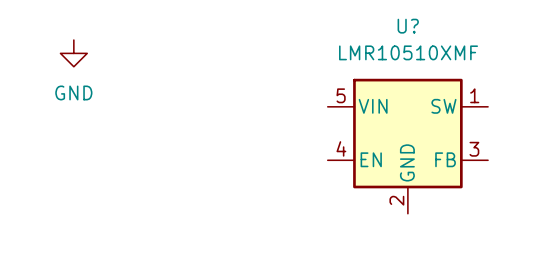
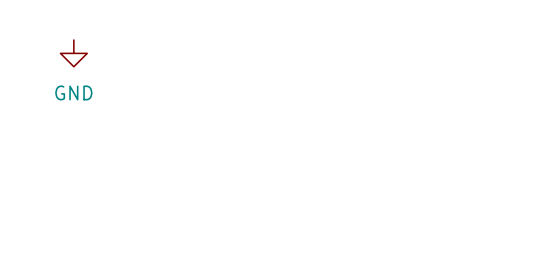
U?: LMR10510XMF (407, 146) -> none

